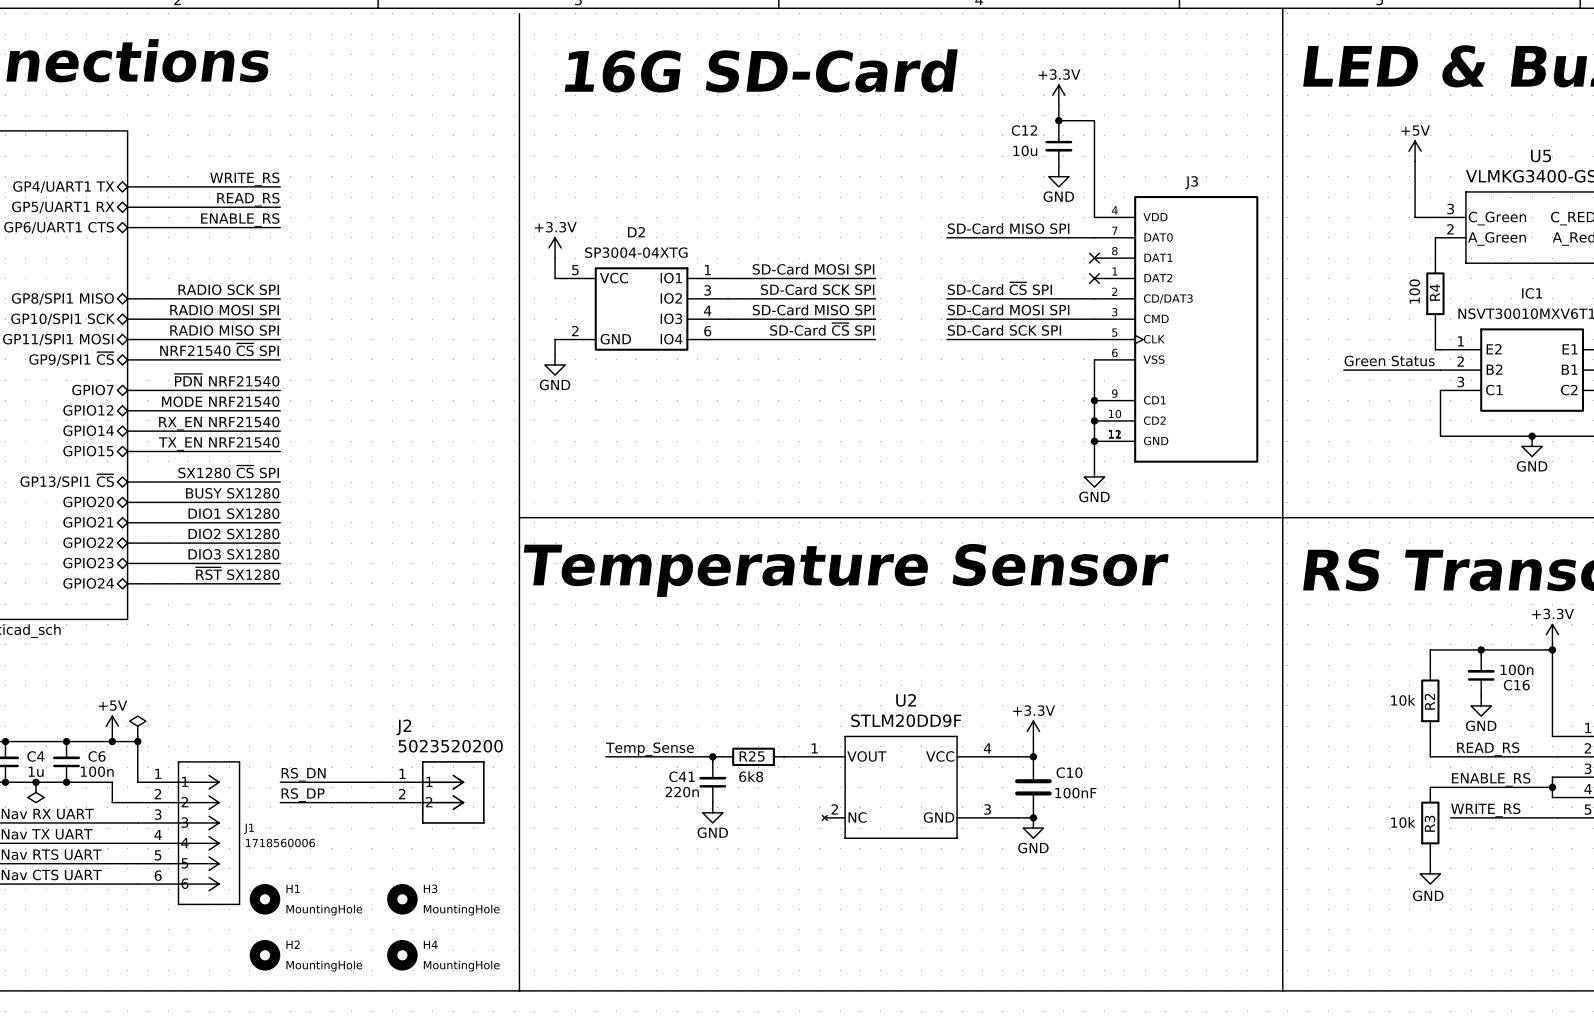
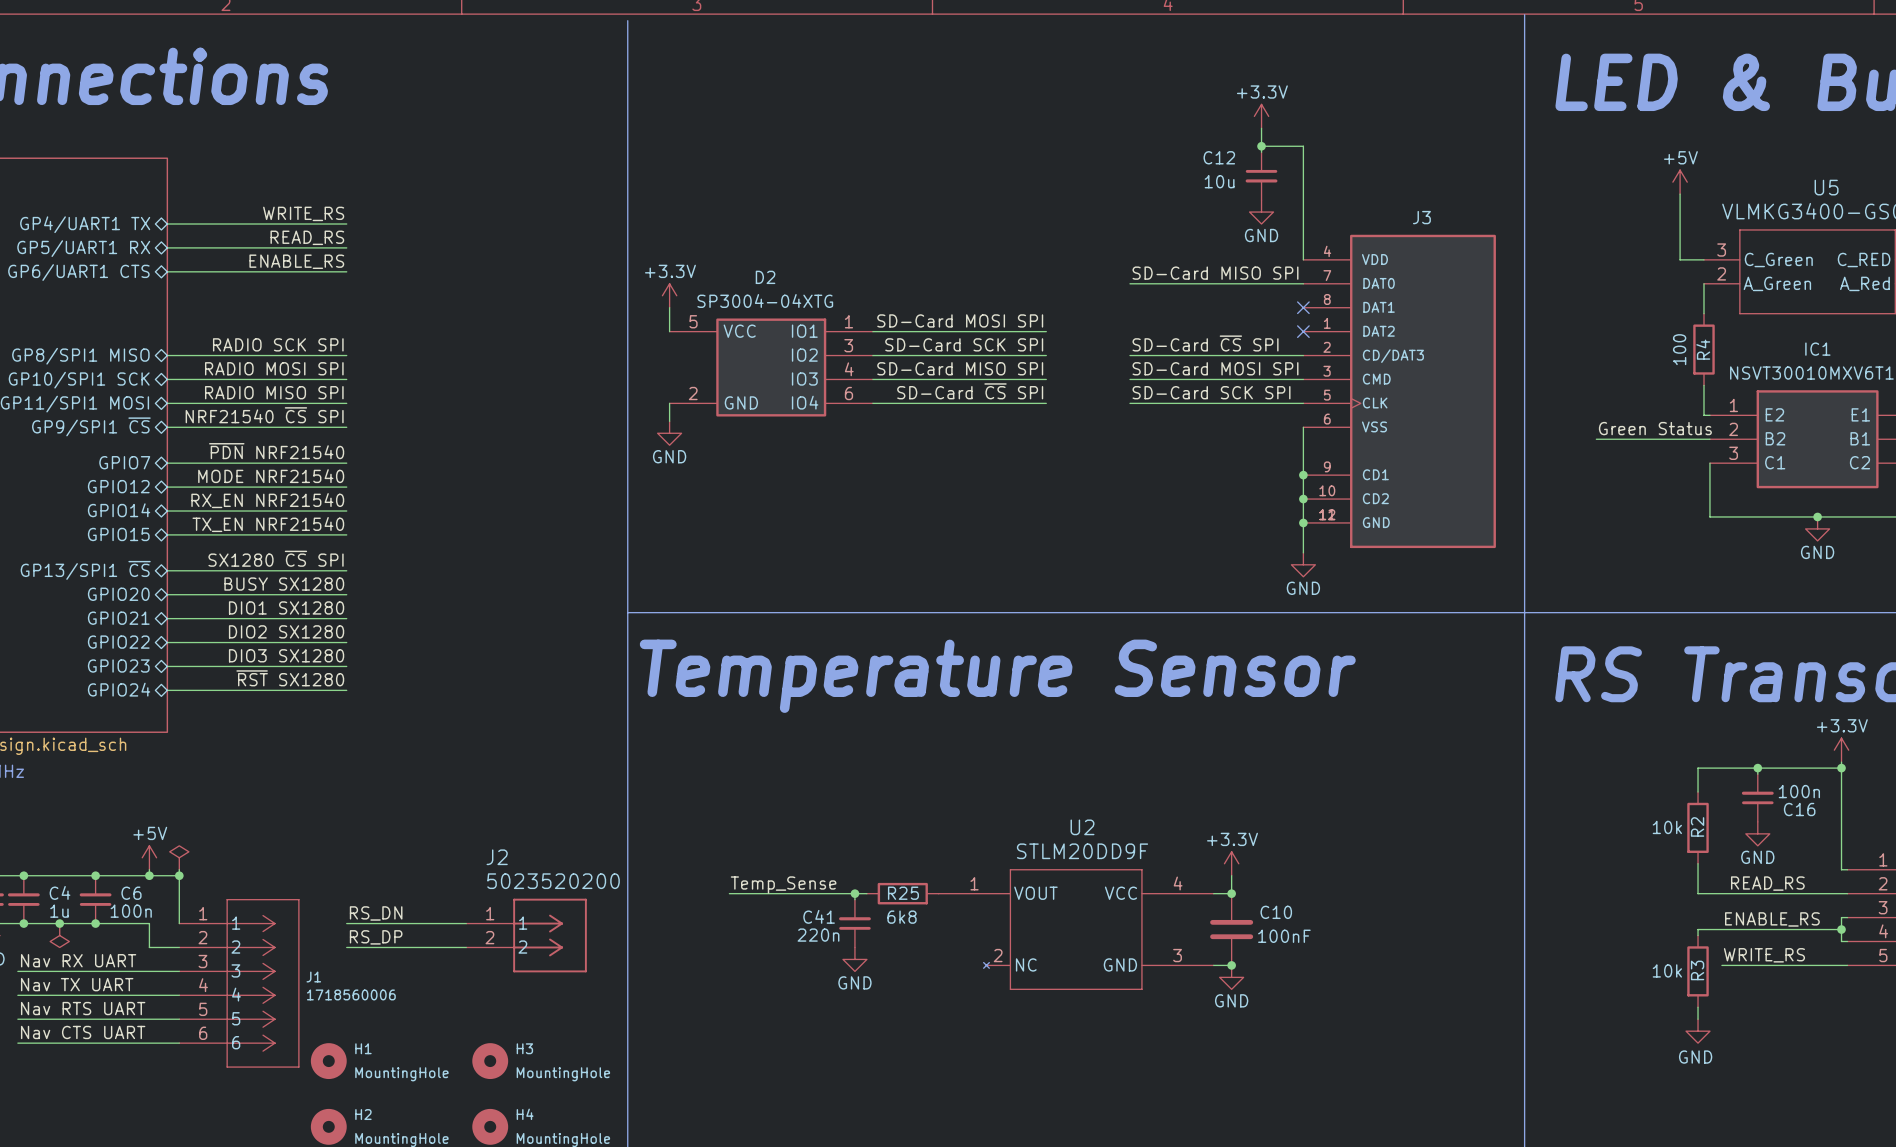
text: 16G SD-Card (761, 70) -> none

